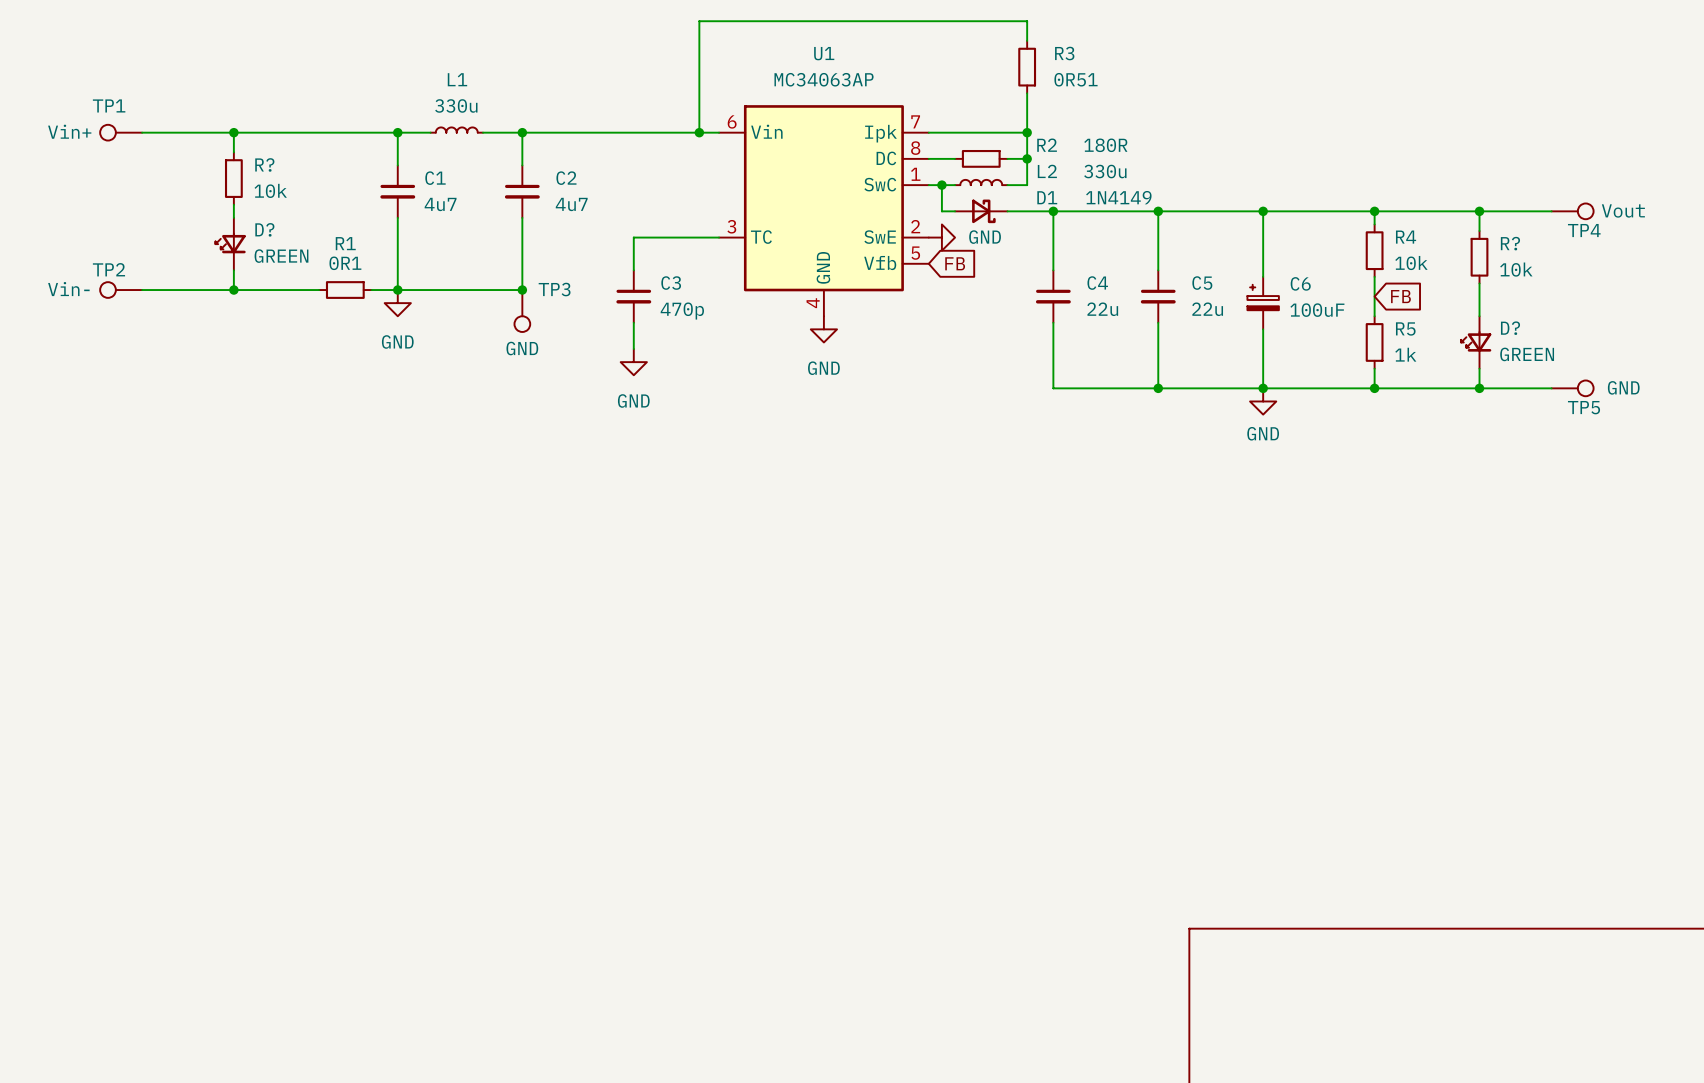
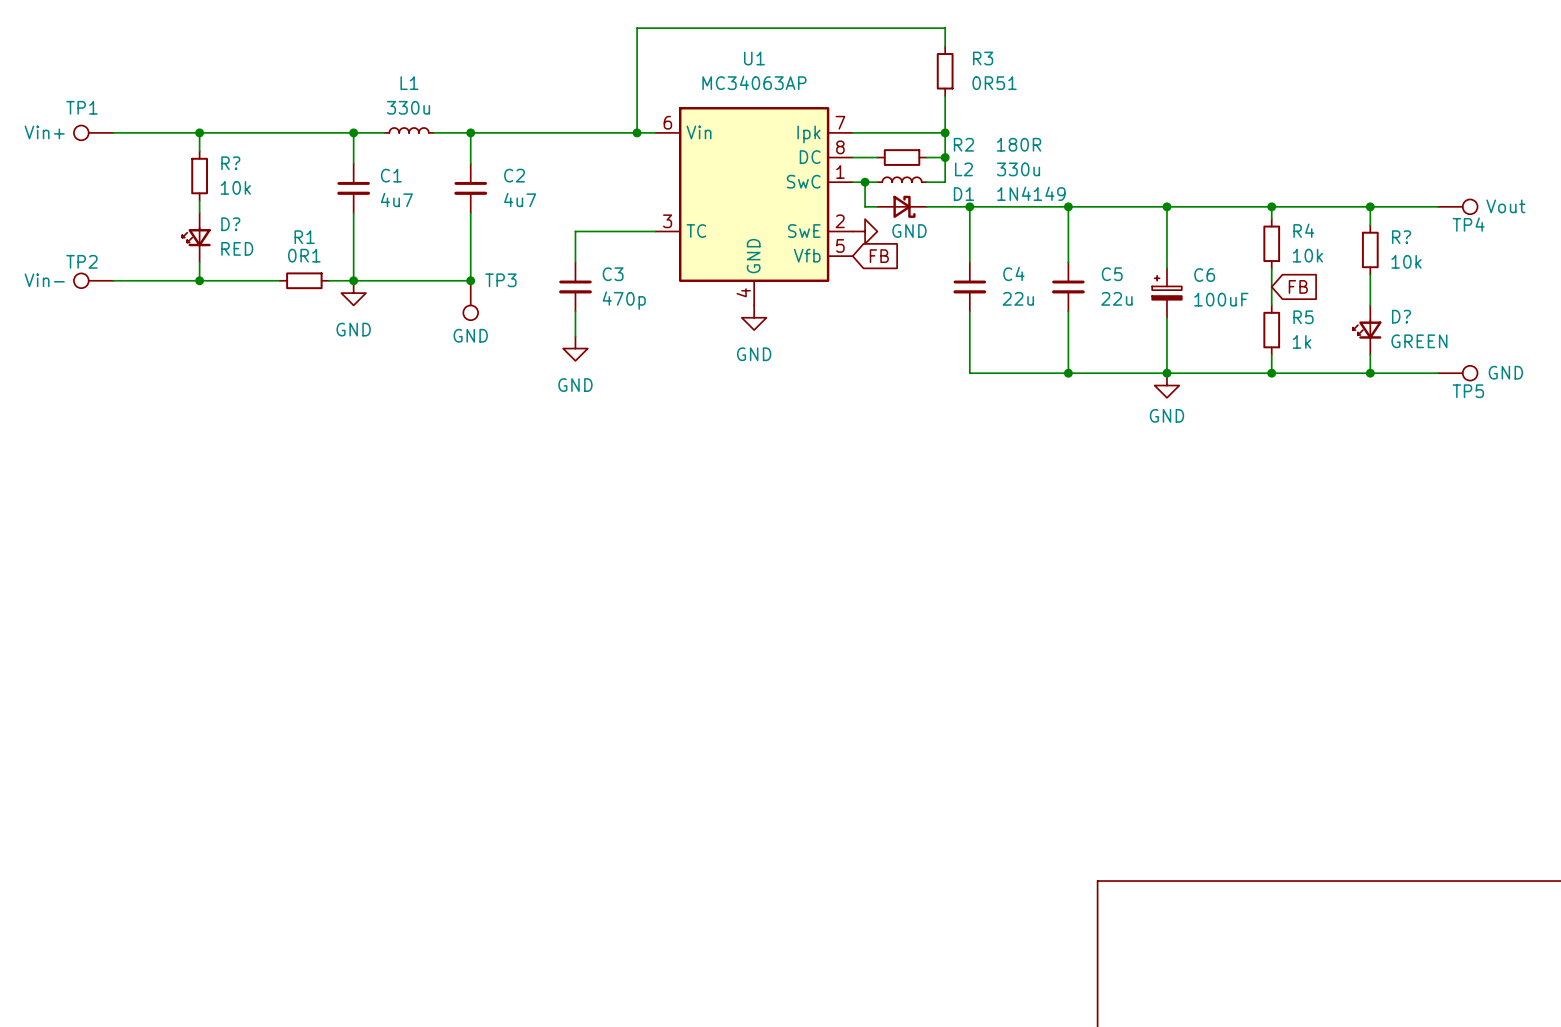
D? value: GREEN (281, 256) -> RED (237, 248)

